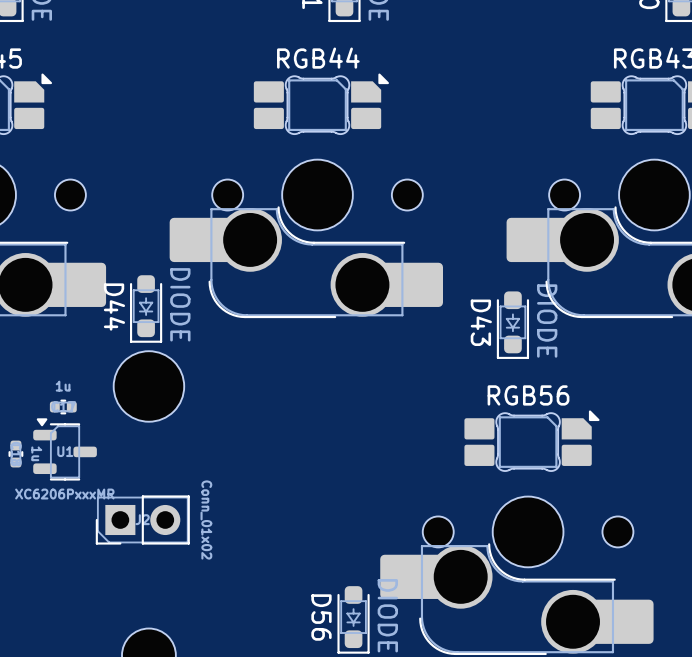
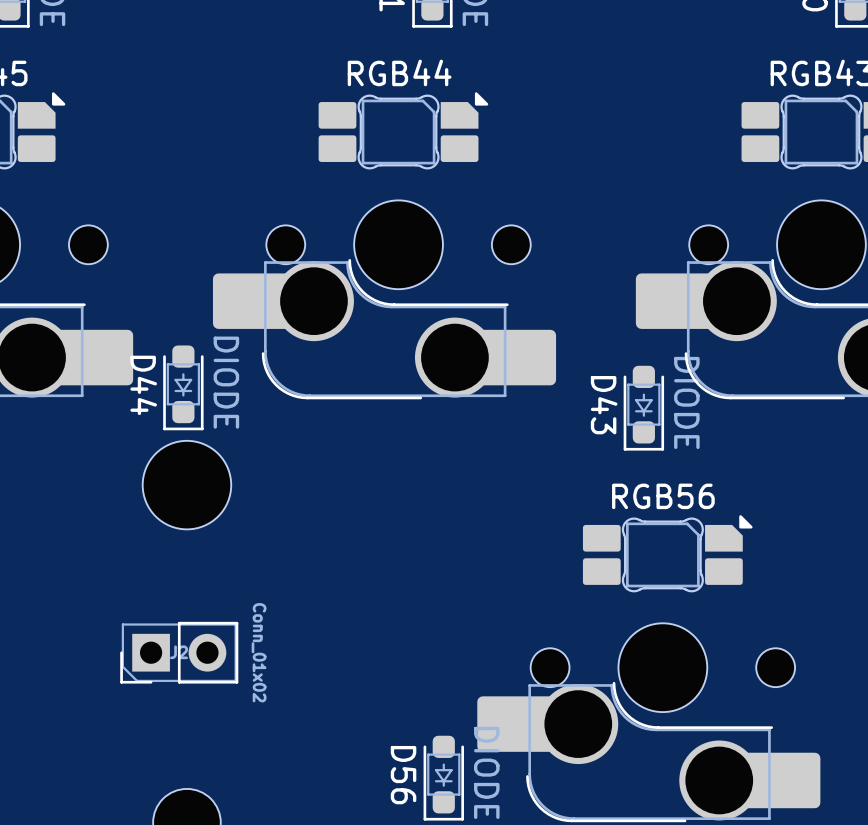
part: 1u (63, 406) -> none
U1: XC6206PxxxMR (65, 449) -> none
part: 1u (15, 454) -> none

